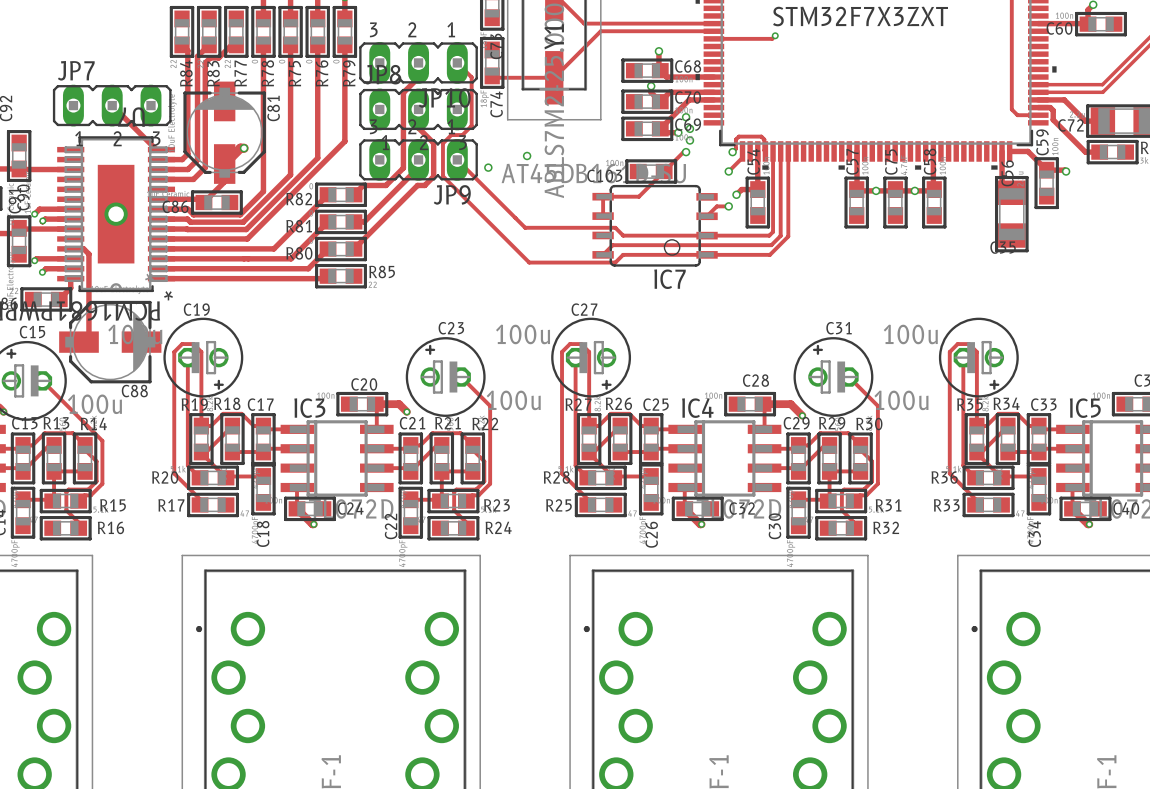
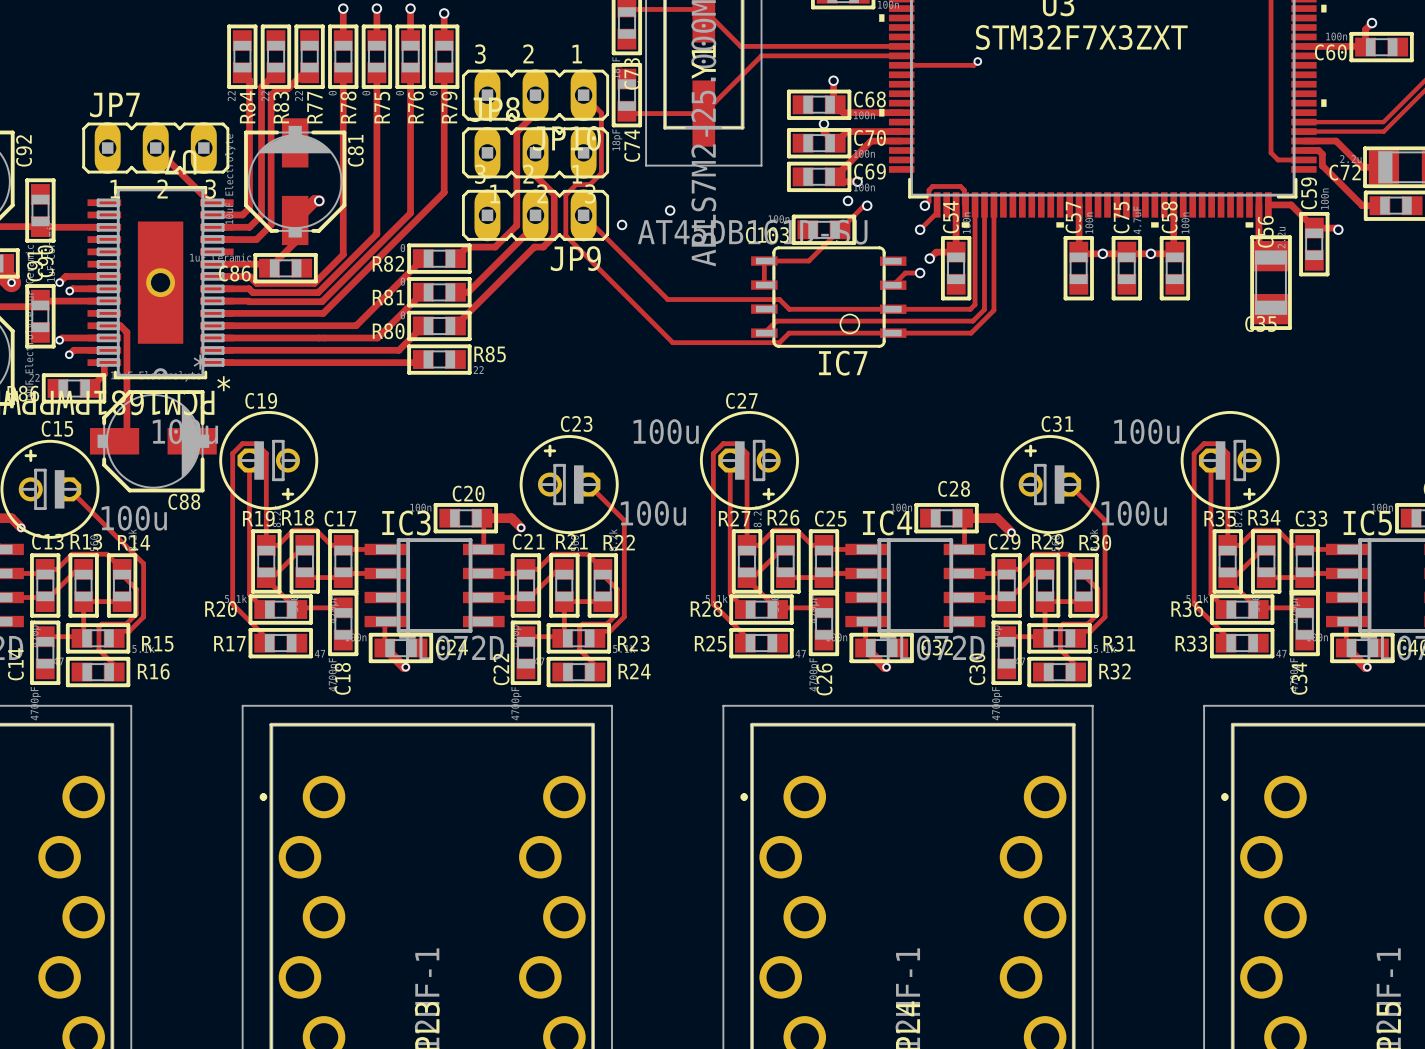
via: (686, 117) -> none
via: (689, 128) -> none
via: (689, 140) -> none
via: none -> (848, 200)

